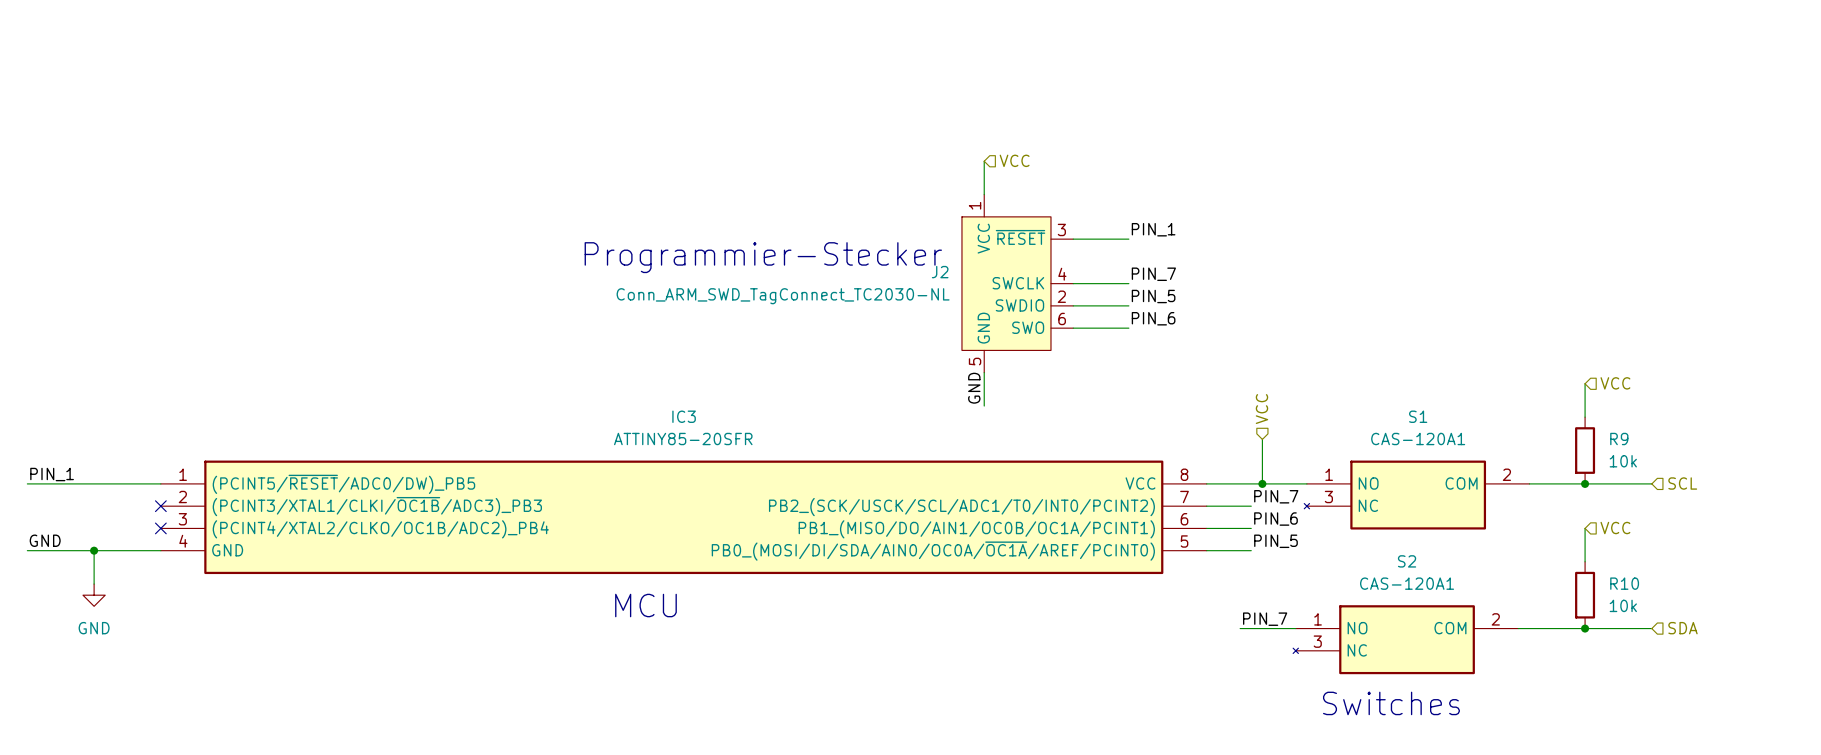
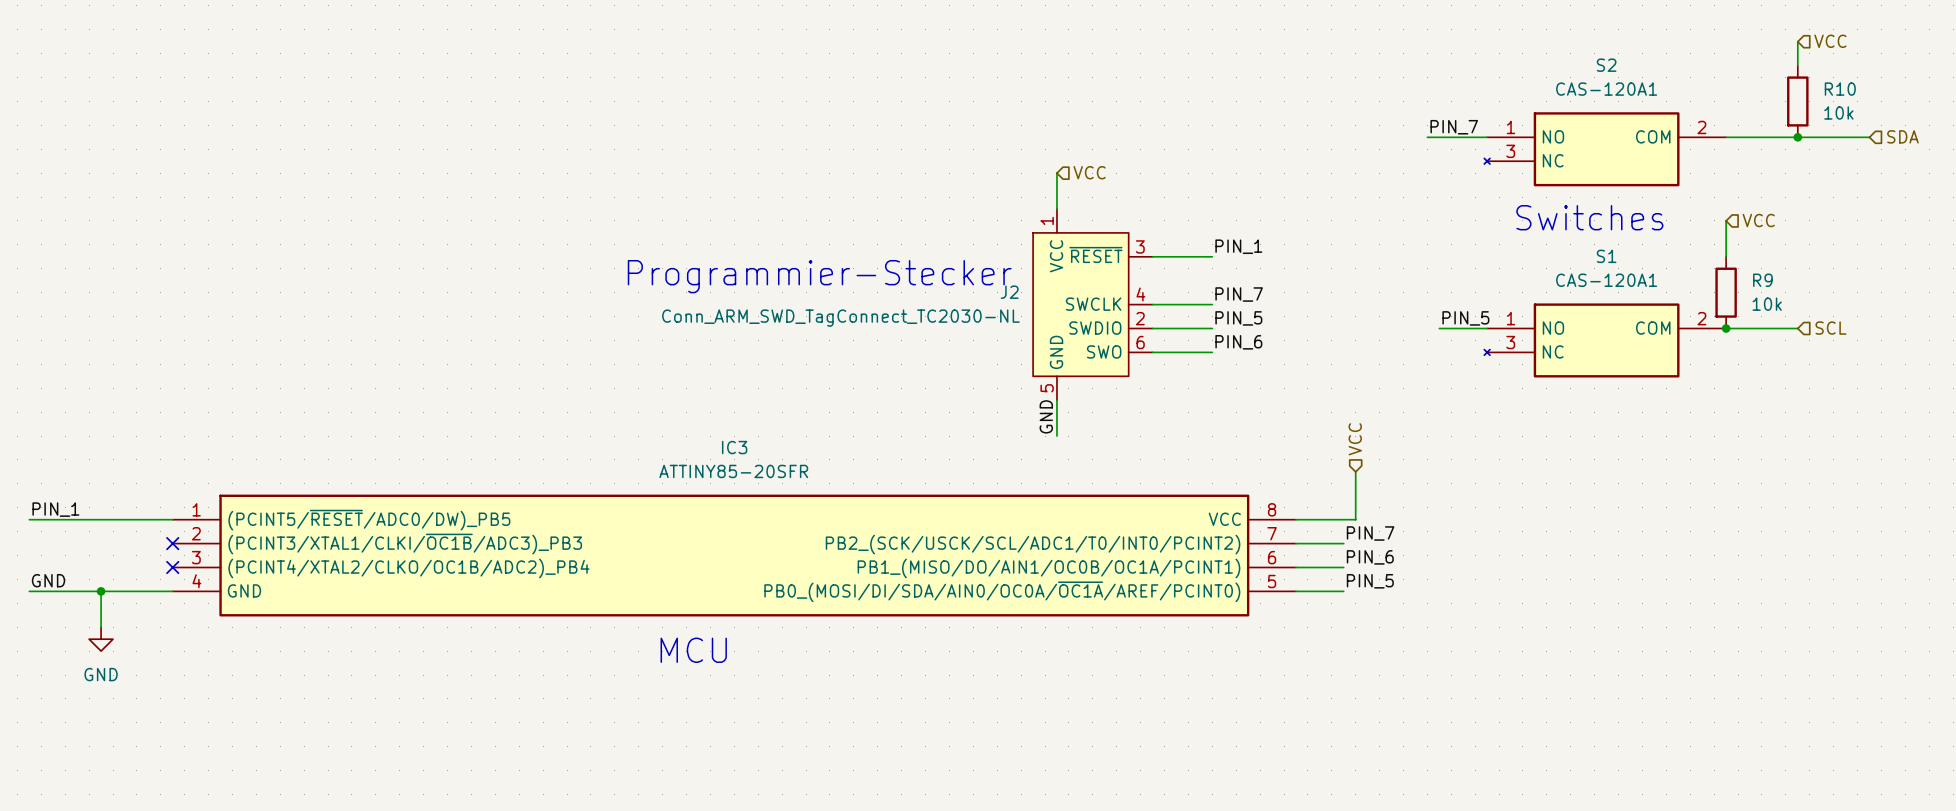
wire: none -> (1797, 41) (1797, 65)
hierarchical label: none -> VCC (1830, 41)
label: none -> PIN_7 (1454, 127)
wire: none -> (1427, 137) (1487, 137)
wire: none -> (1726, 137) (1869, 137)
junction: none -> (1797, 137)
hierarchical label: none -> SDA (1902, 136)
text: none -> Switches (1589, 217)
hierarchical label: none -> VCC (1758, 220)
label: none -> PIN_5 (1465, 318)
wire: none -> (1726, 328) (1797, 328)
junction: none -> (1726, 328)
wire: (1585, 383) (1585, 417) -> (1726, 220) (1726, 256)
hierarchical label: VCC (1615, 383) -> none
R9 position: (1585, 450) -> (1726, 292)
wire: (1262, 483) (1306, 483) -> (1439, 328) (1487, 328)
junction: (1262, 483) -> none
wire: (1529, 483) (1651, 483) -> none
junction: (1585, 483) -> none
hierarchical label position: SCL (1682, 483) -> SCL (1831, 328)
S1 position: (1416, 495) -> (1605, 340)
wire: (1585, 528) (1585, 561) -> none
hierarchical label: VCC (1615, 528) -> none
R10 position: (1585, 595) -> (1797, 101)
label: PIN_7 (1265, 619) -> none
wire: (1240, 628) (1295, 628) -> none
wire: (1518, 628) (1651, 628) -> none
junction: (1585, 628) -> none
hierarchical label: SDA (1682, 628) -> none
S2 position: (1405, 639) -> (1605, 149)
text: Switches (1391, 703) -> none

